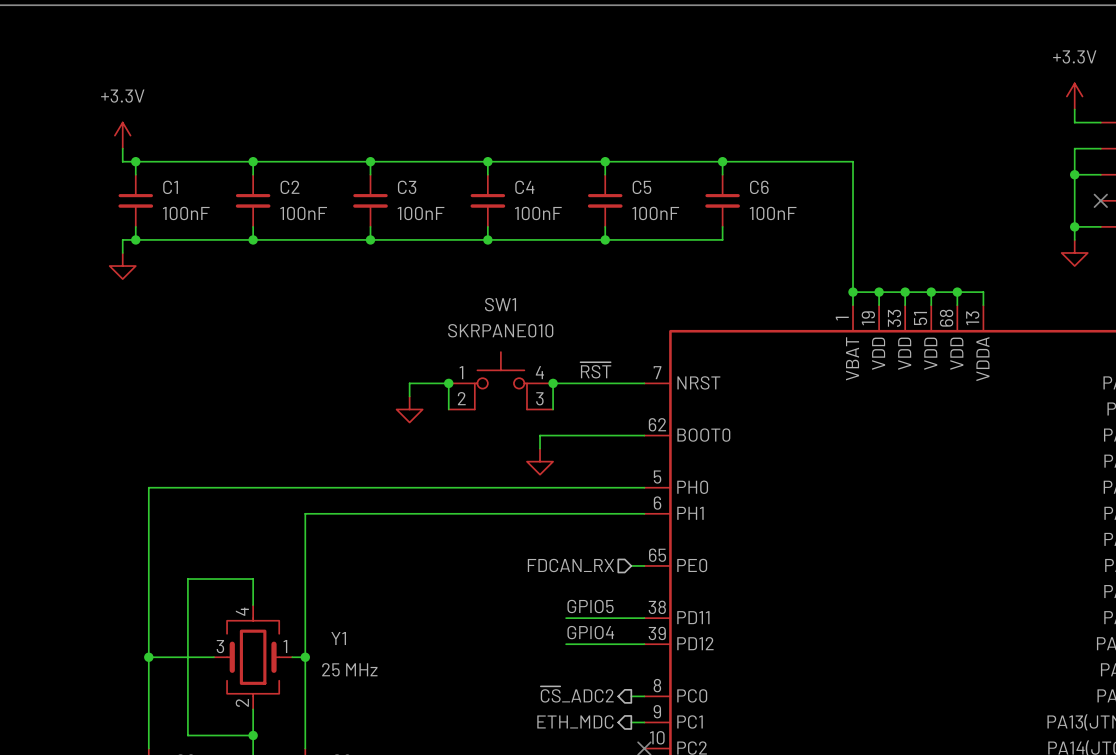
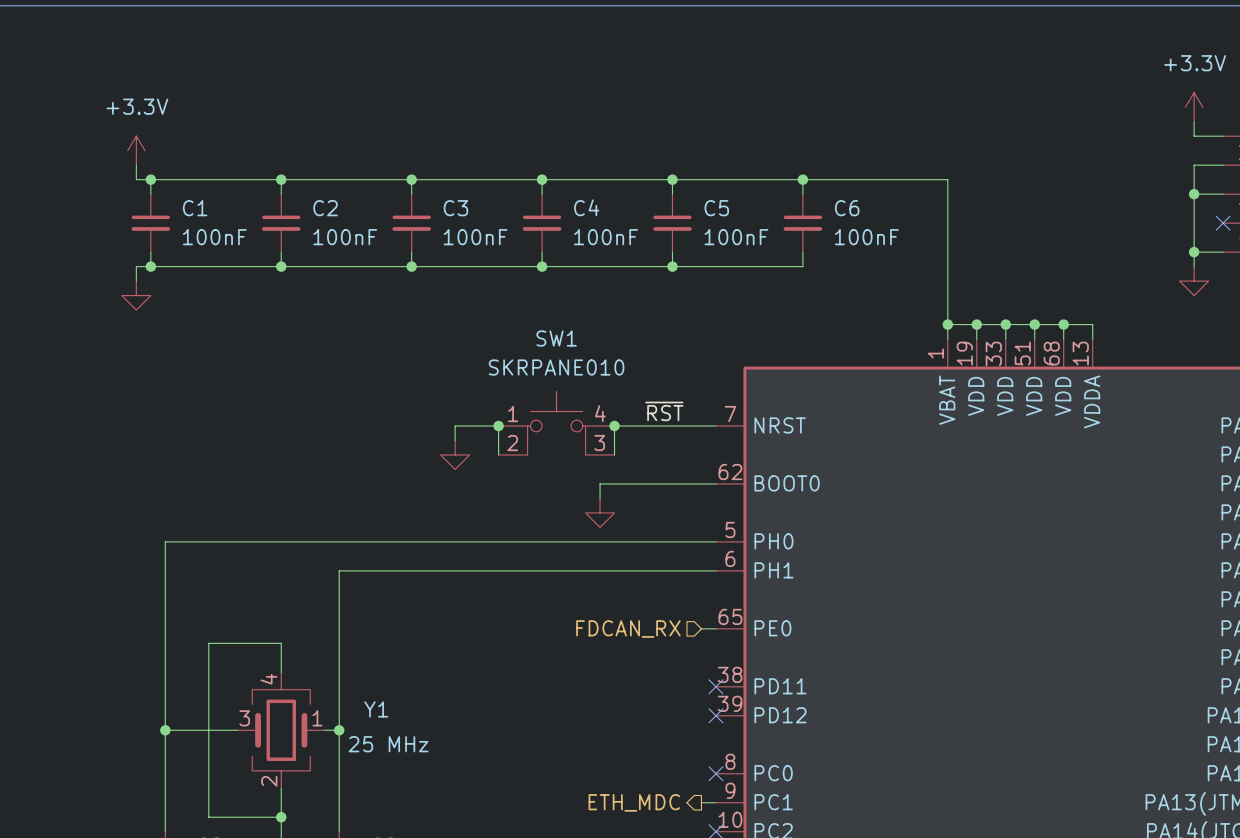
label: GPIO5 (590, 606) -> none
wire: (566, 618) (644, 618) -> none
no-connect mark: none -> (715, 686)
label: GPIO4 (590, 632) -> none
wire: (566, 644) (644, 644) -> none
no-connect mark: none -> (715, 715)
hierarchical label: ~{CS}_ADC2 (577, 694) -> none
wire: (631, 696) (644, 696) -> none
no-connect mark: none -> (715, 773)

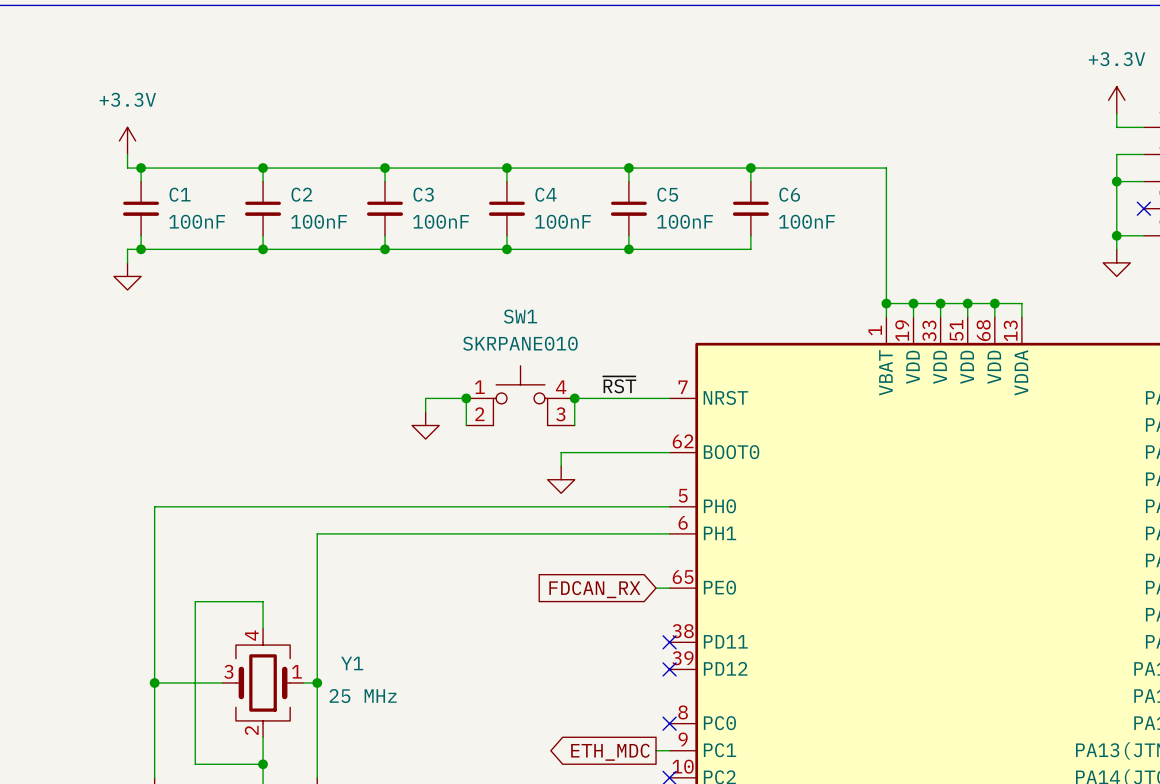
hierarchical label: FDCAN_RX (628, 629) -> none
global label: none -> FDCAN_RX (594, 589)
hierarchical label: ETH_MDC (634, 802) -> none
global label: none -> ETH_MDC (610, 752)

